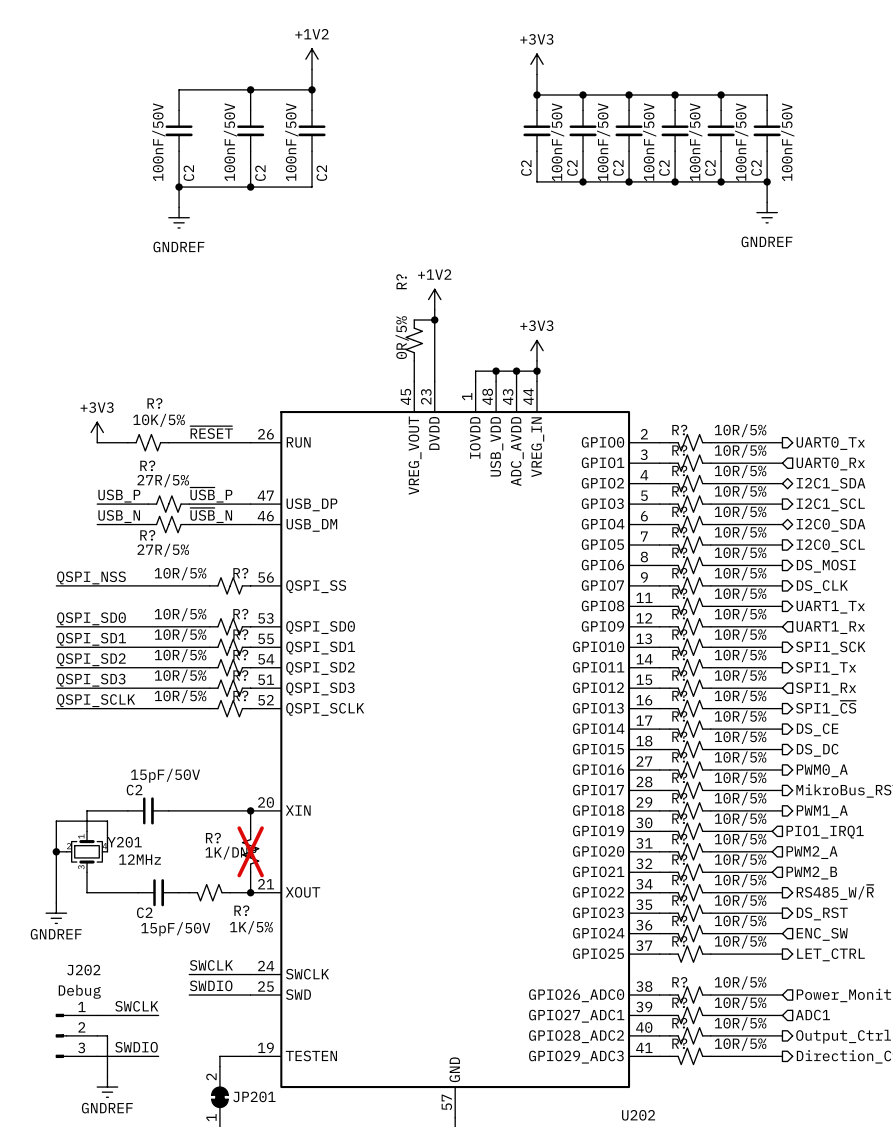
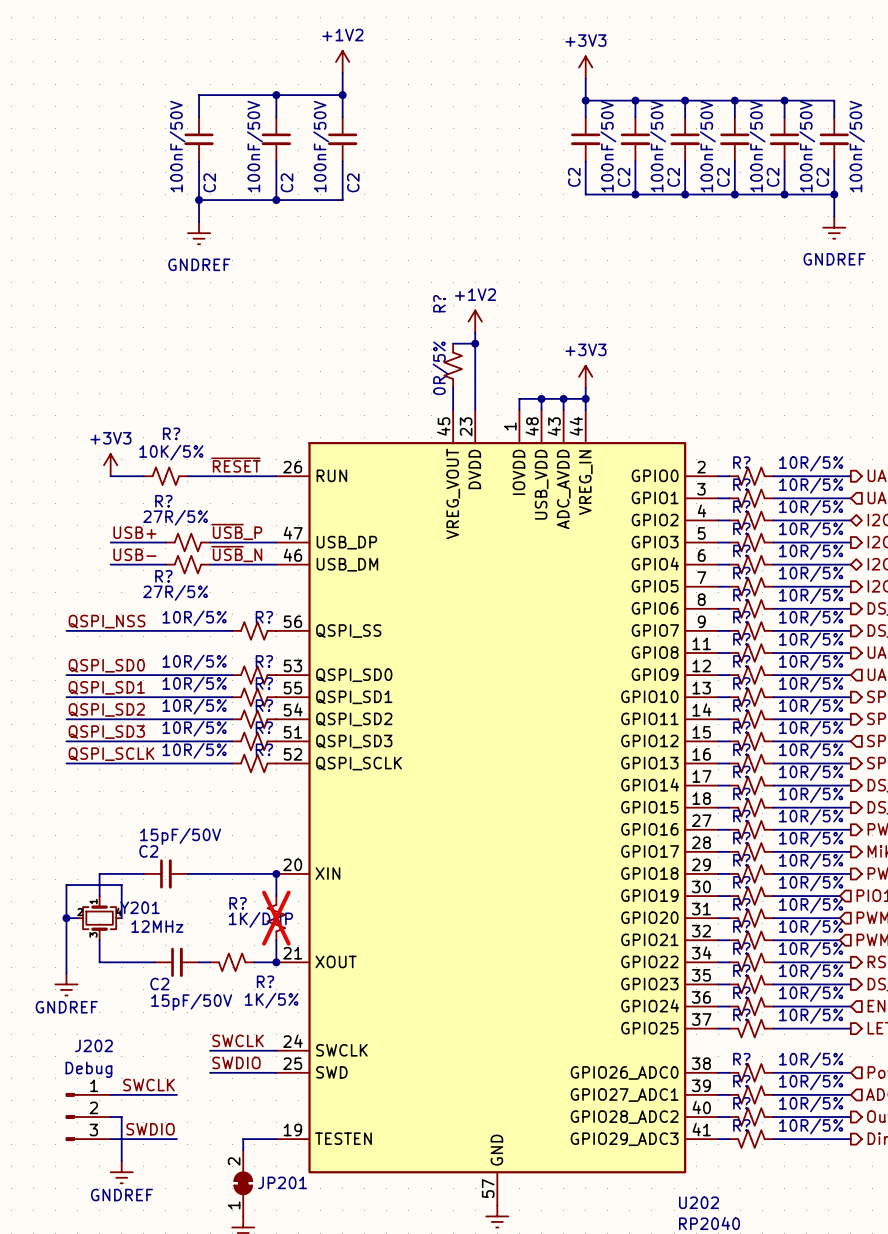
label: USB_P (119, 496) -> USB+ (134, 532)
label: USB_N (119, 516) -> USB- (134, 554)

